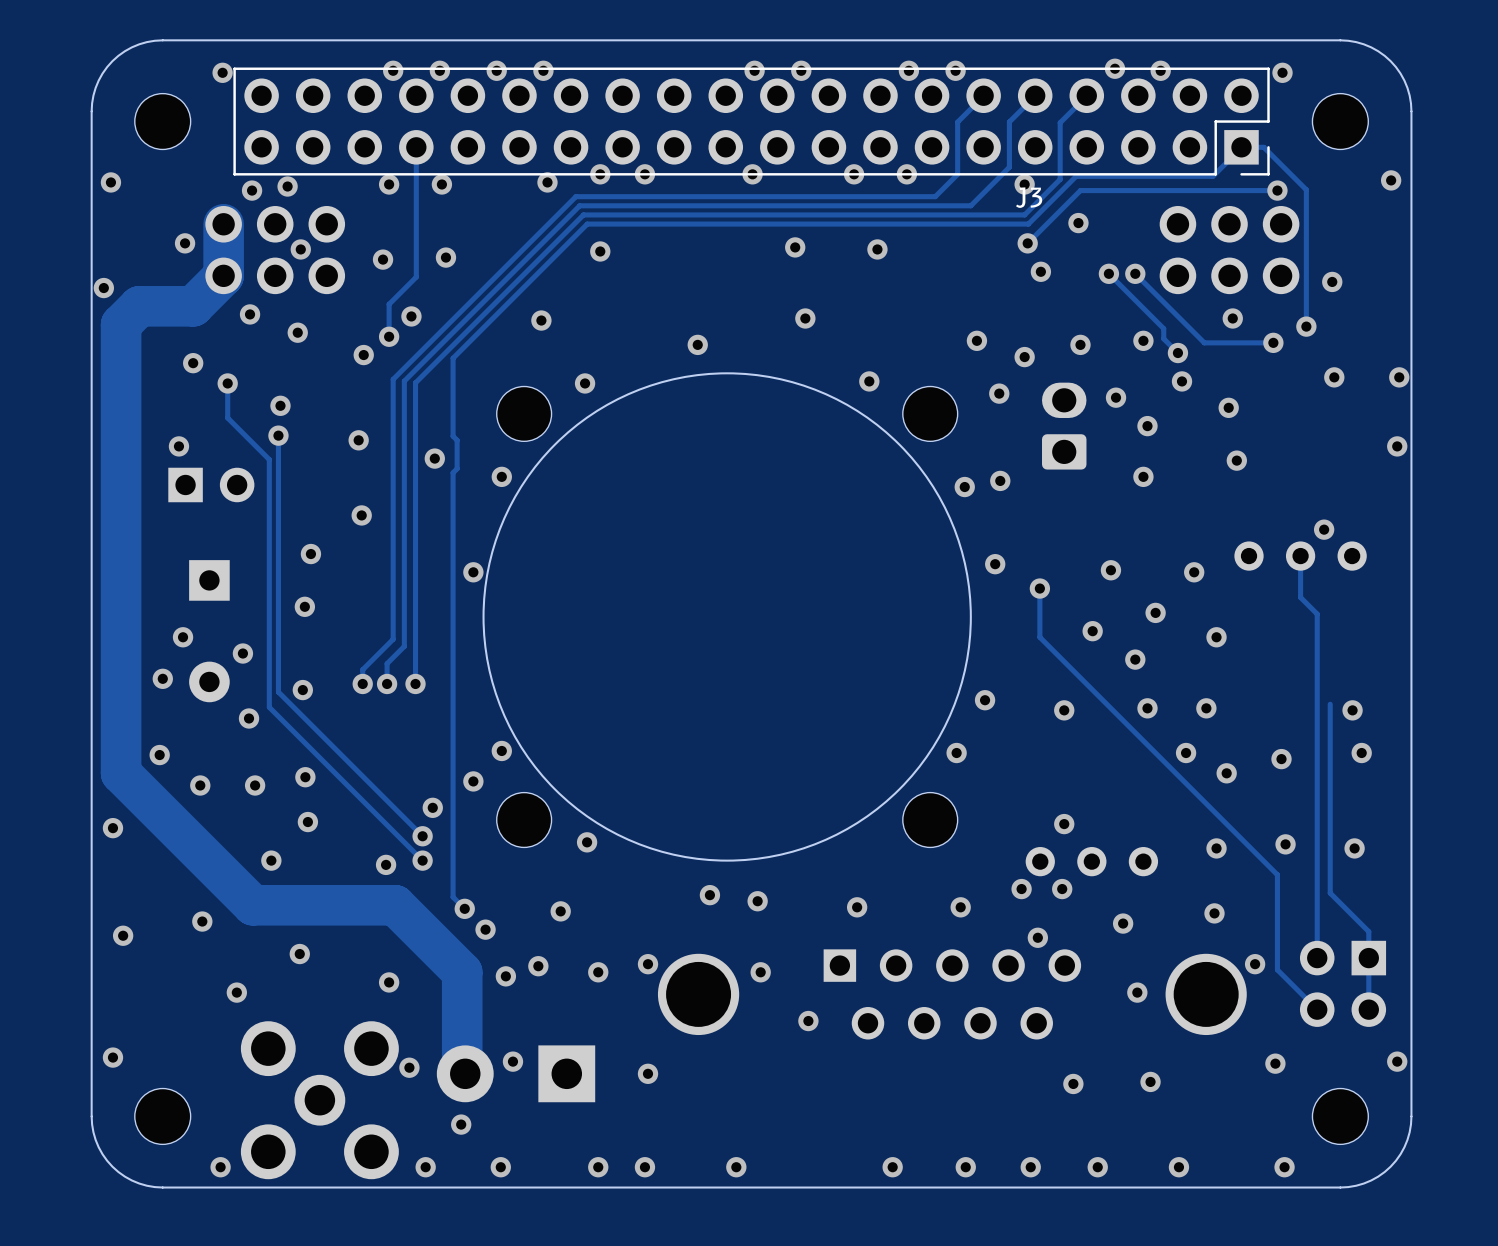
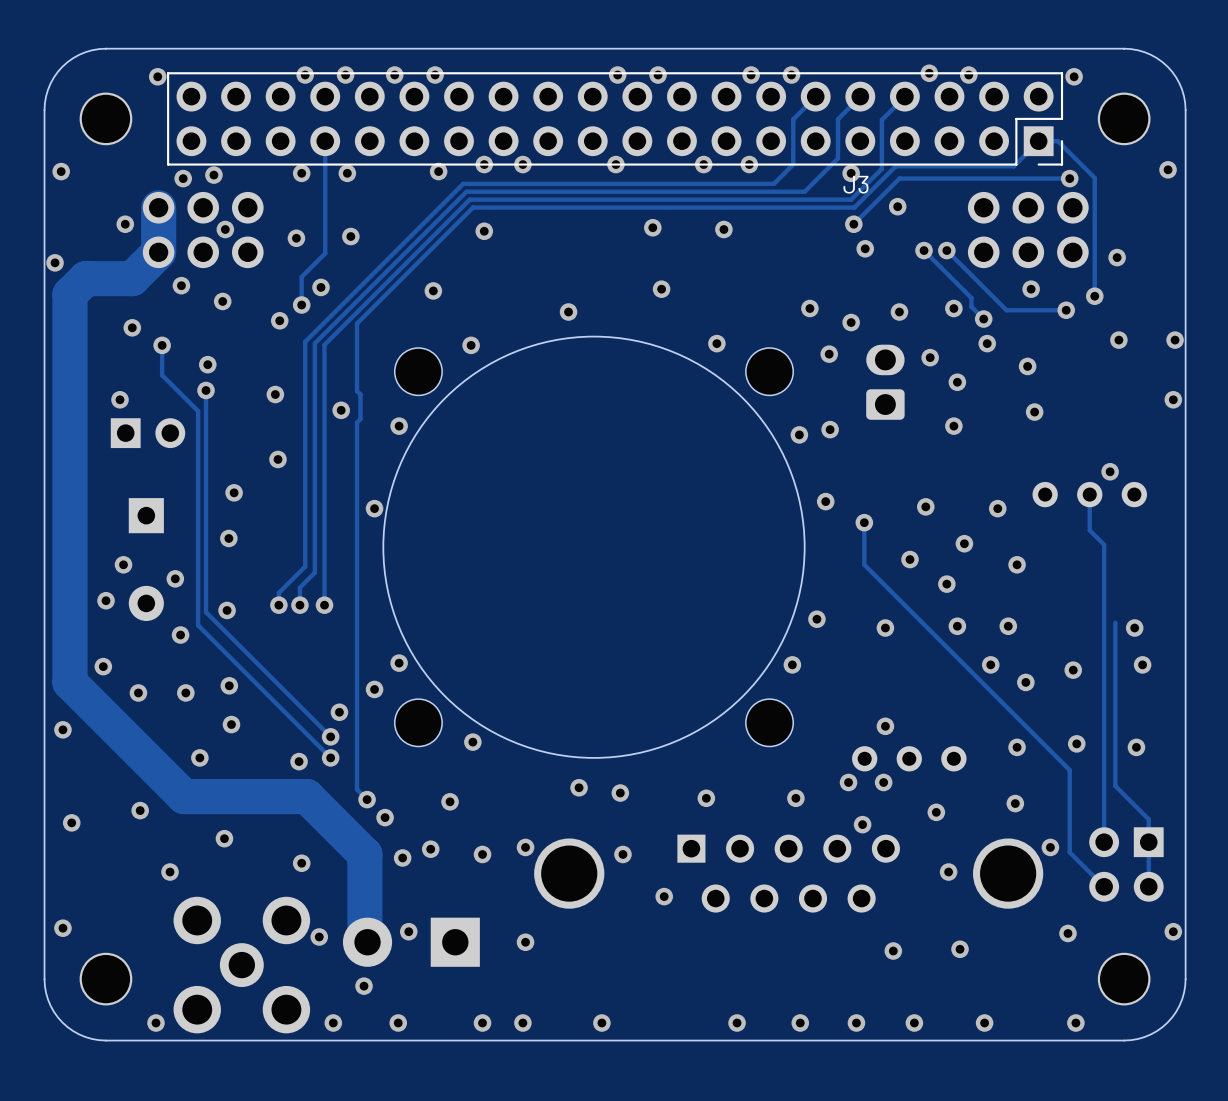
part footprint: [134, 93, 191, 150] -> [79, 92, 133, 146]
part footprint: [1312, 93, 1369, 150] -> [1097, 92, 1151, 146]
part footprint: [134, 1088, 191, 1145] -> [79, 952, 133, 1006]
part footprint: [1312, 1088, 1369, 1145] -> [1097, 952, 1151, 1006]

